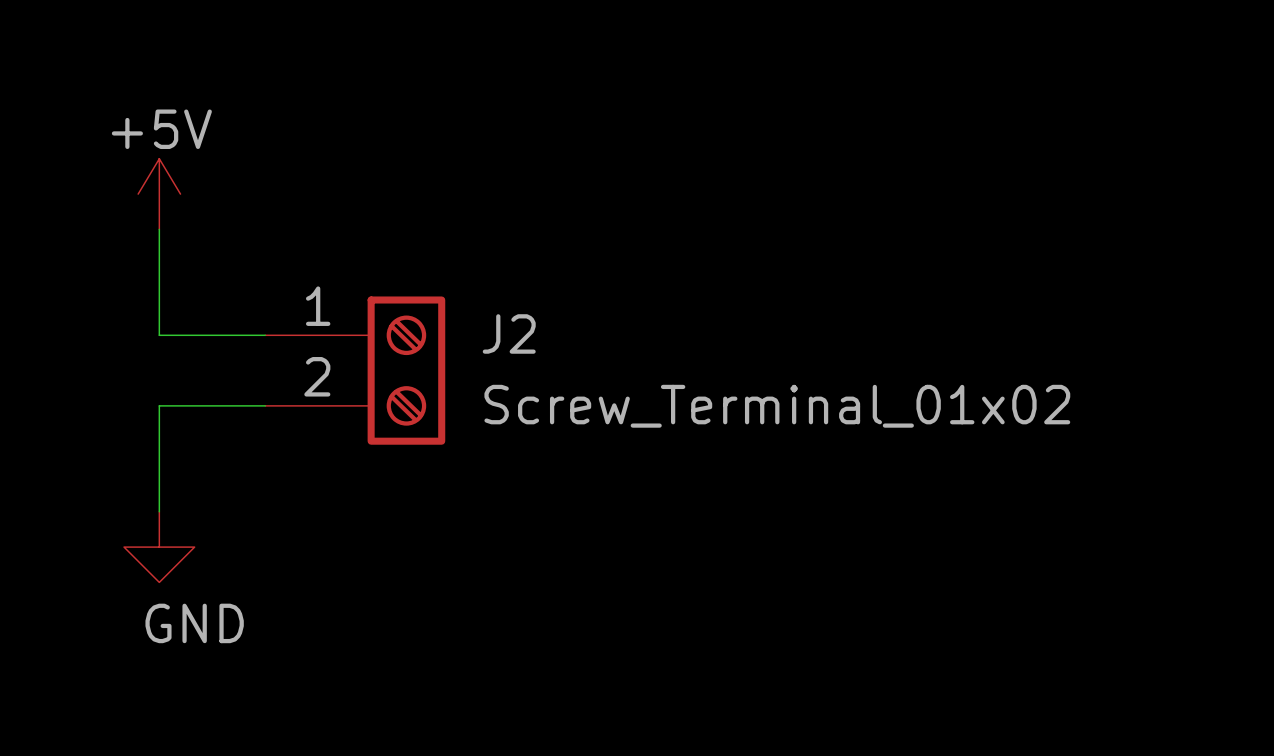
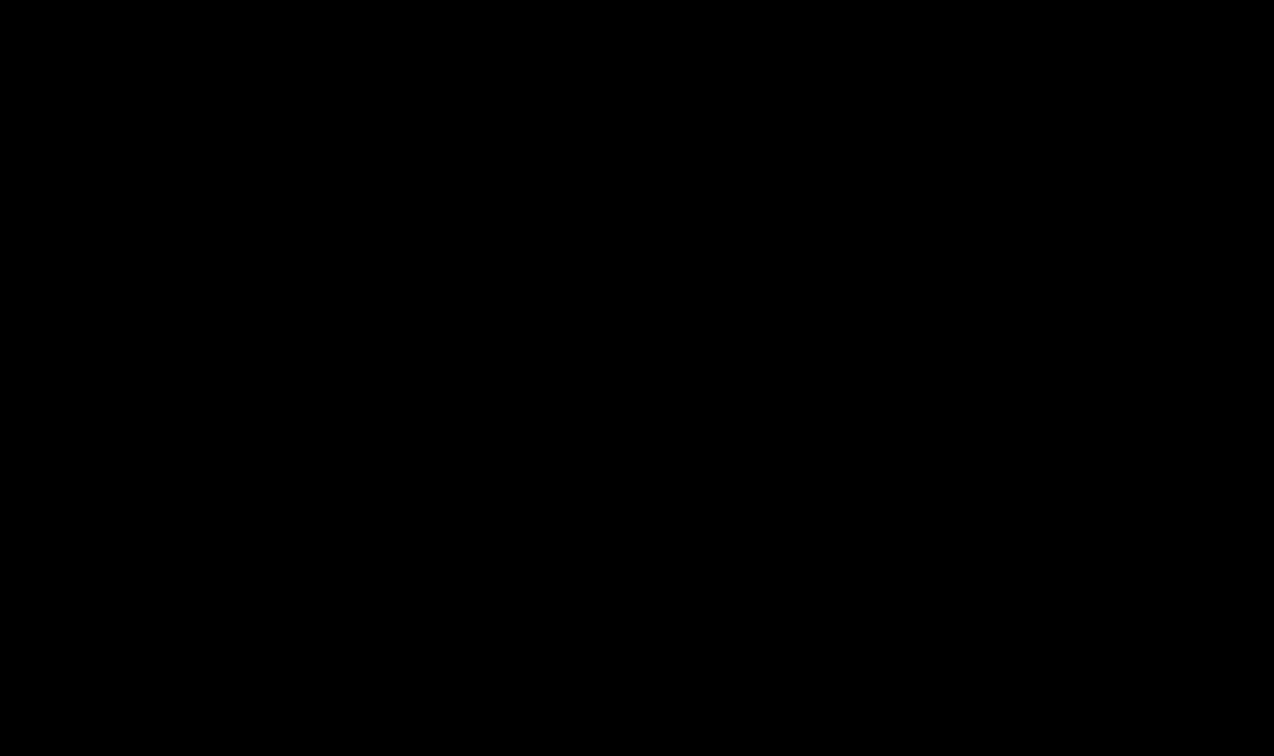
power symbol: +5V (159, 194) -> none
wire: (159, 229) (159, 335) (265, 335) -> none
J2: Screw_Terminal_01x02 (355, 370) -> none
wire: (265, 405) (159, 405) (159, 511) -> none
power symbol: GND (159, 547) -> none

